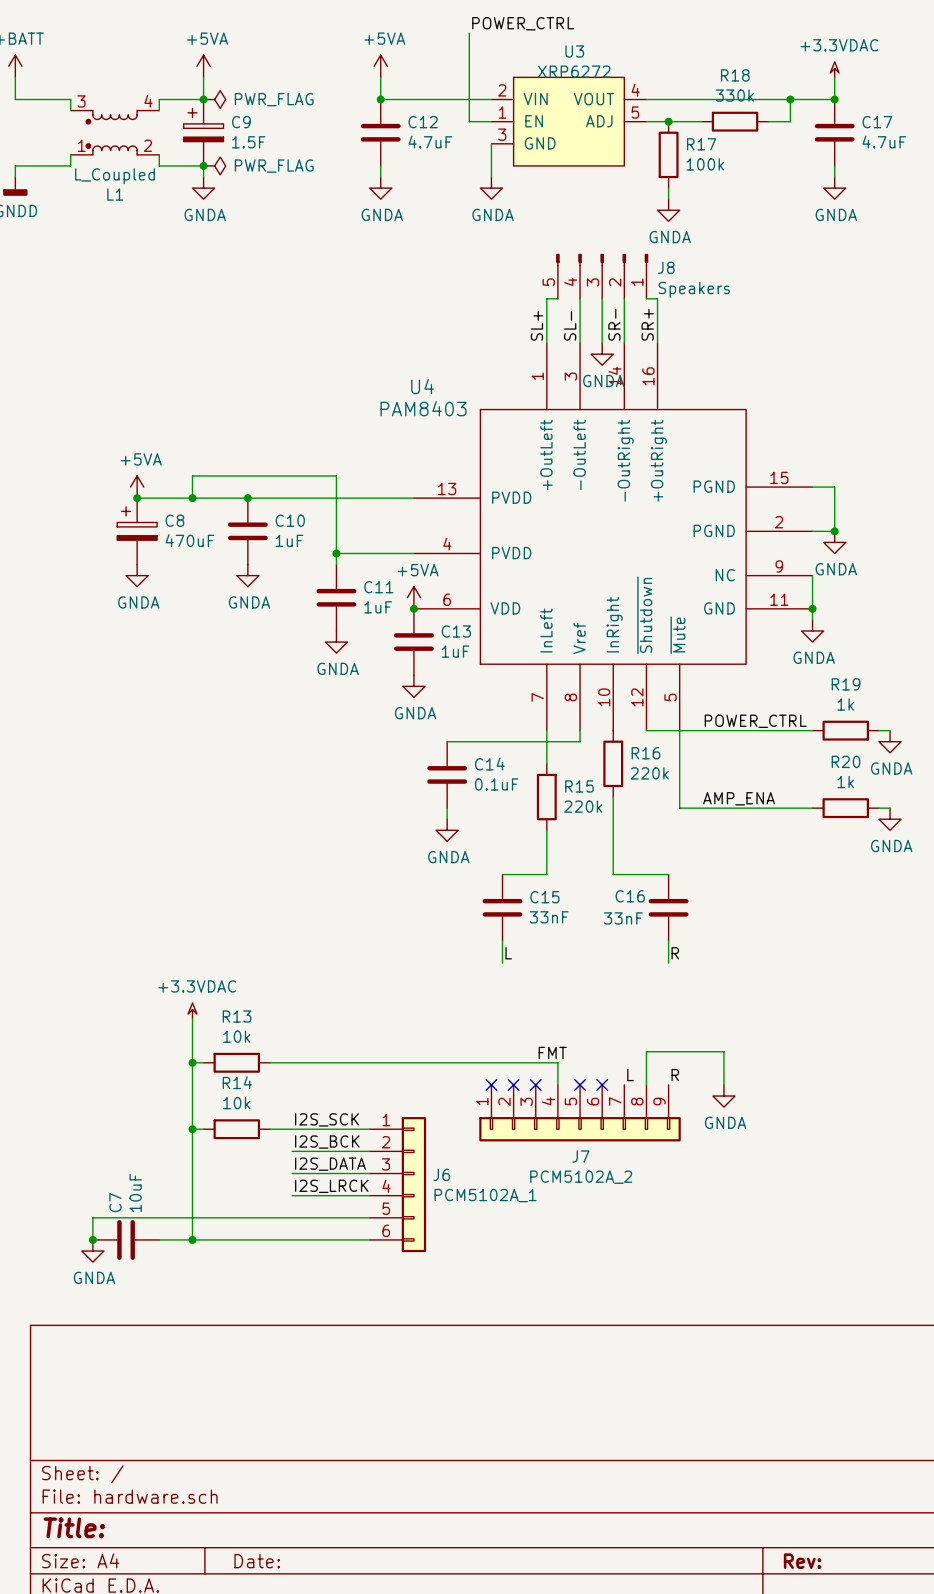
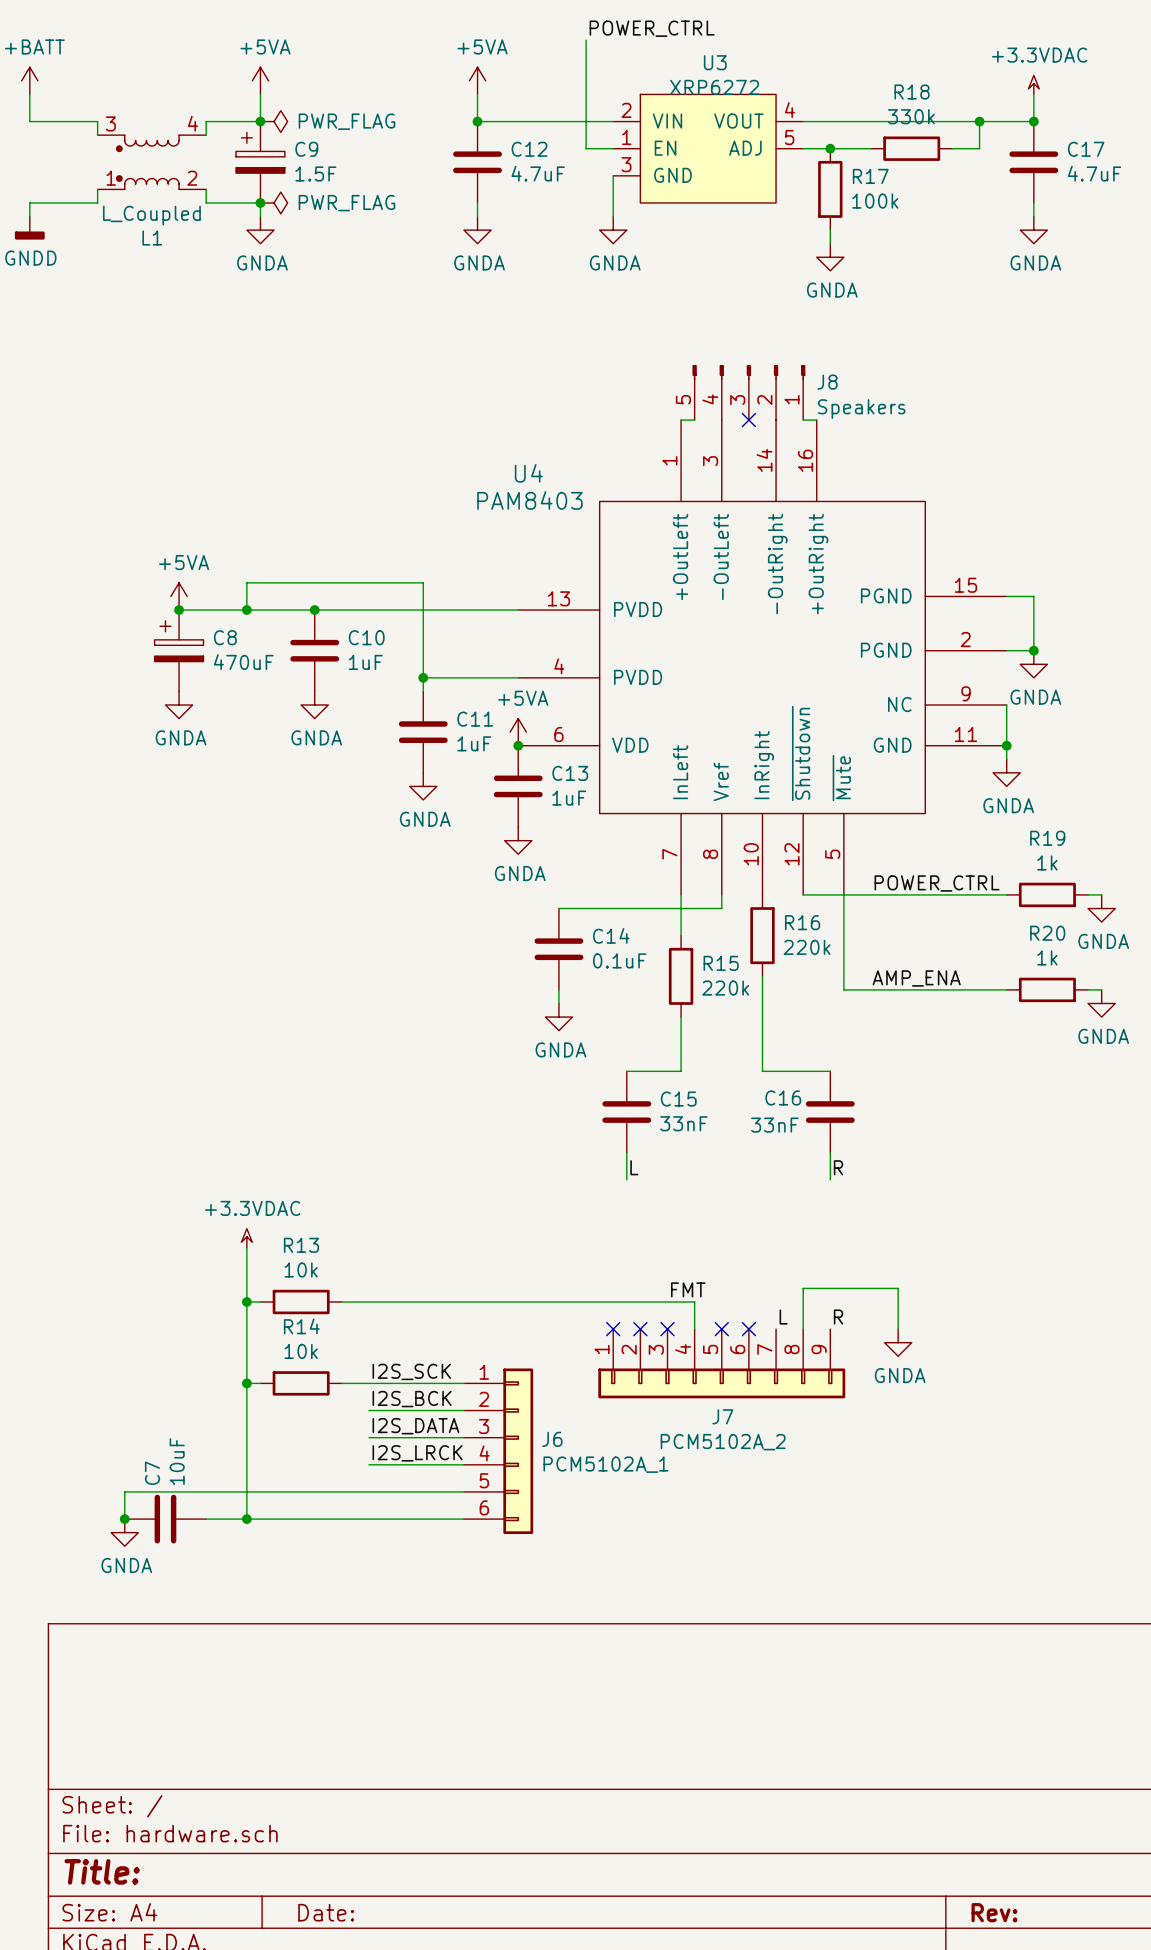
J8 position: (602, 276) -> (748, 392)
wire: (557, 298) (546, 298) (546, 343) -> (694, 420) (681, 420)
wire: (646, 298) (657, 298) (657, 343) -> (803, 420) (816, 420)
label: SR- (614, 324) -> none
label: SR+ (647, 324) -> none
label: SL+ (536, 325) -> none
label: SL- (570, 325) -> none
no-connect mark: none -> (748, 420)
power symbol: GNDA (602, 354) -> none

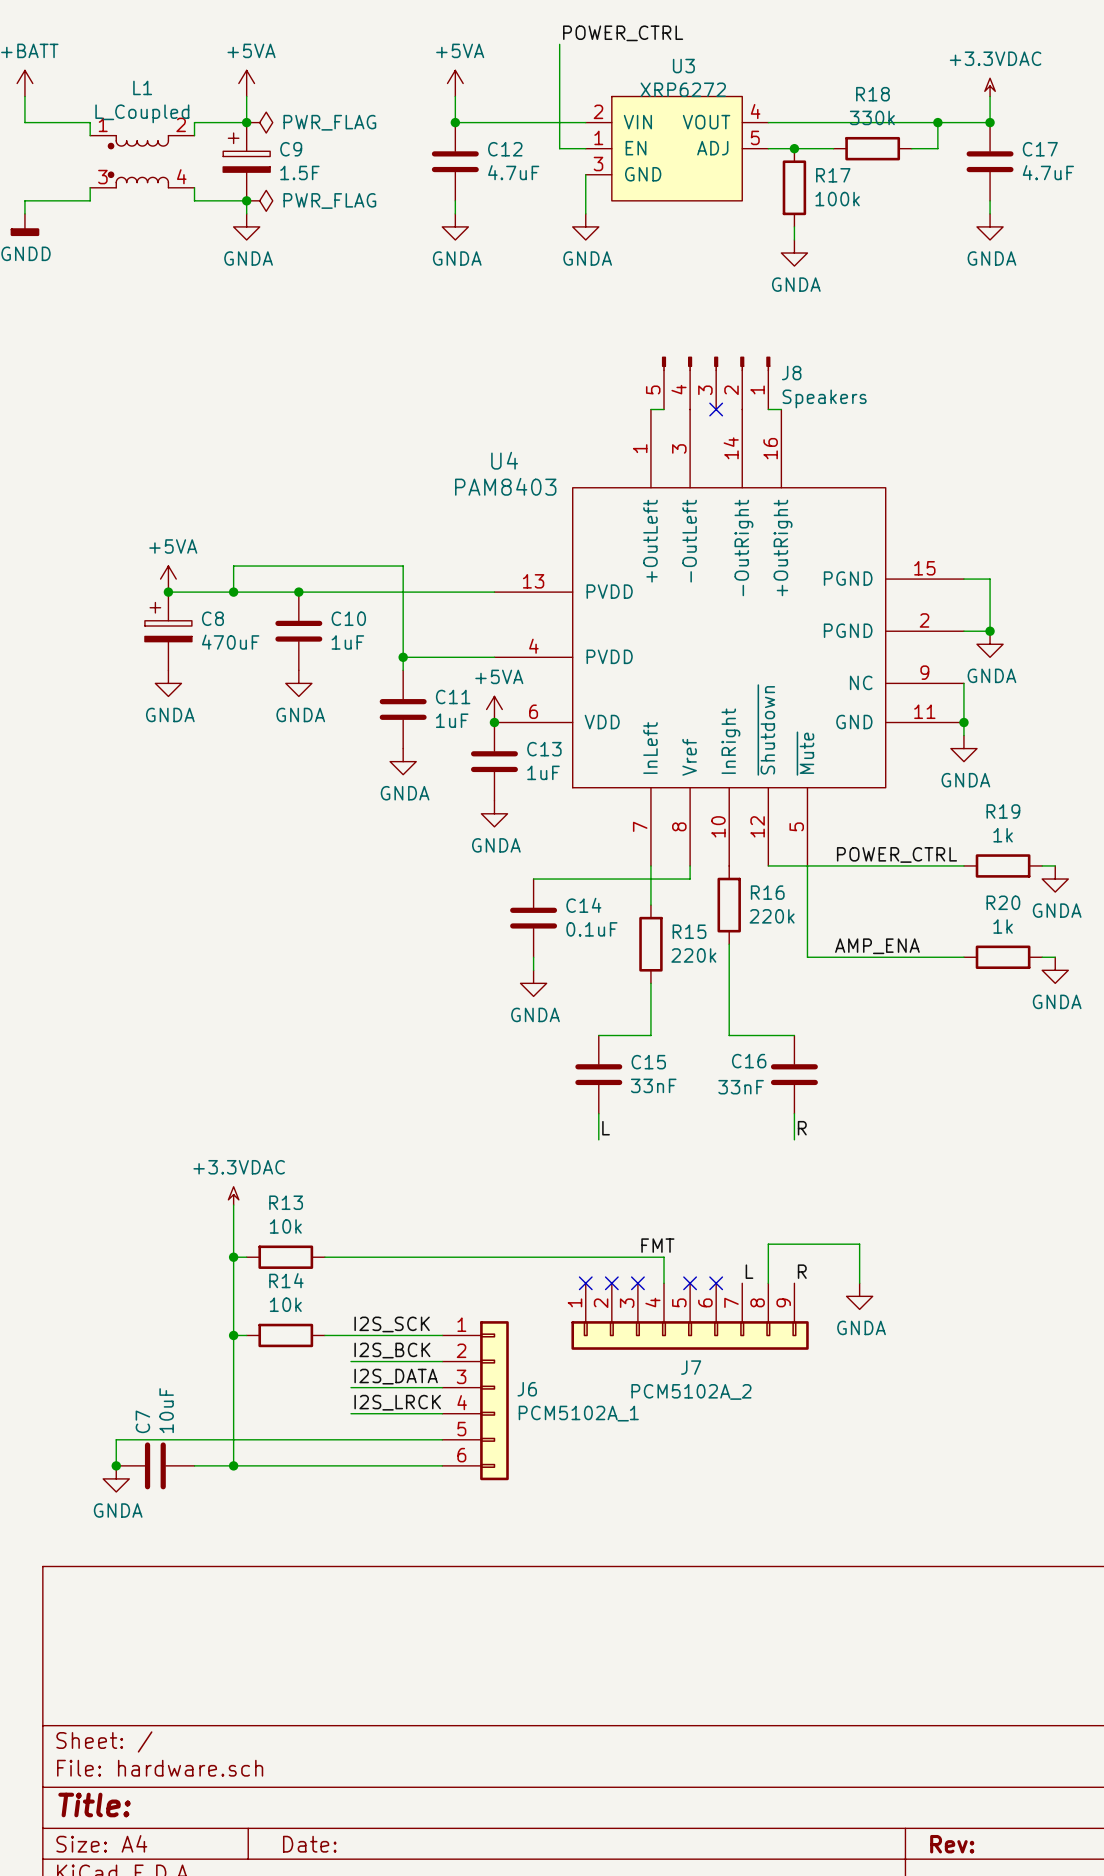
L1 flip: as is (147, 162) -> up-down (138, 161)

